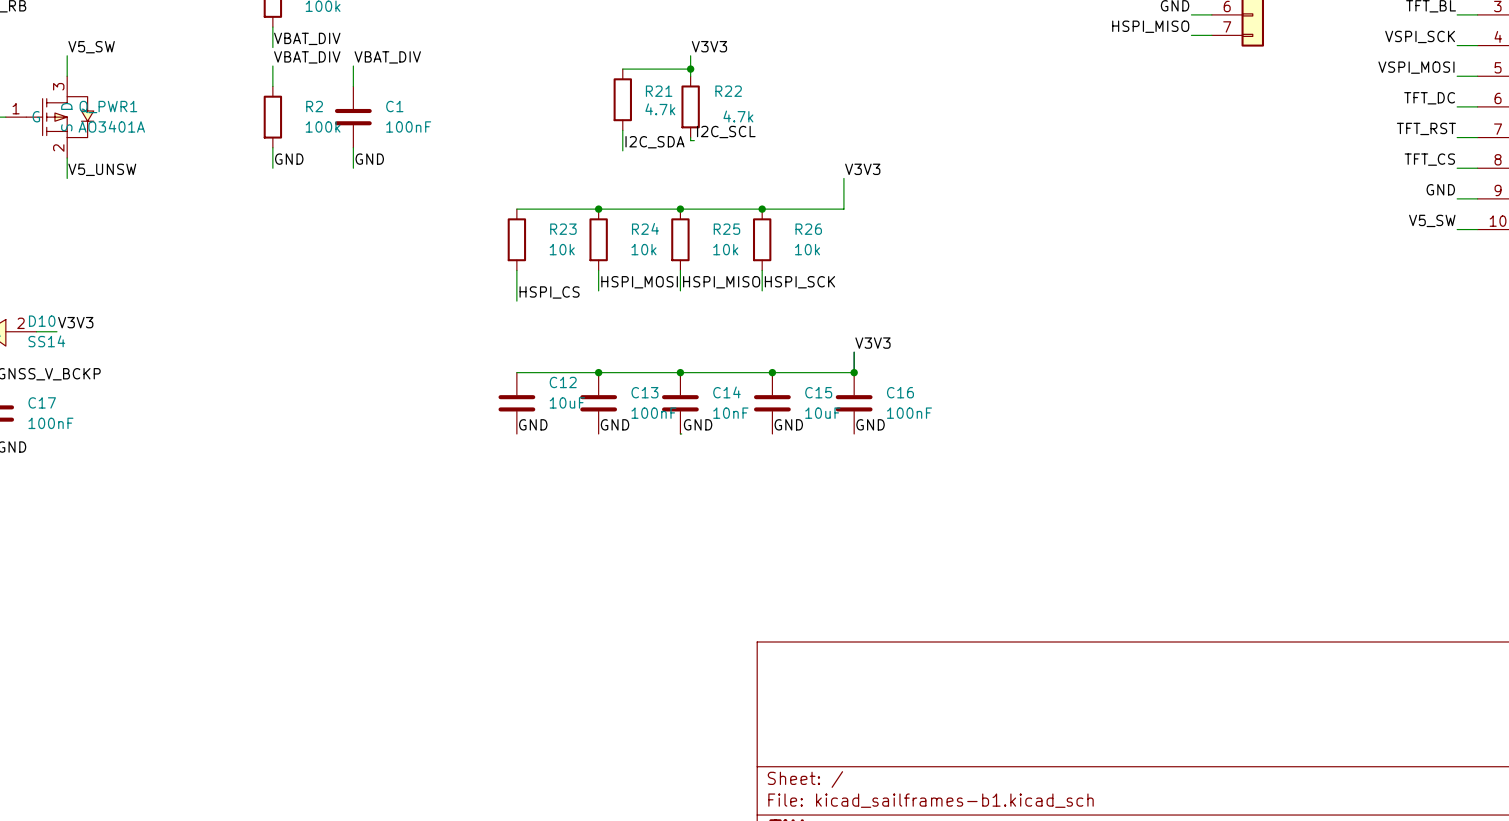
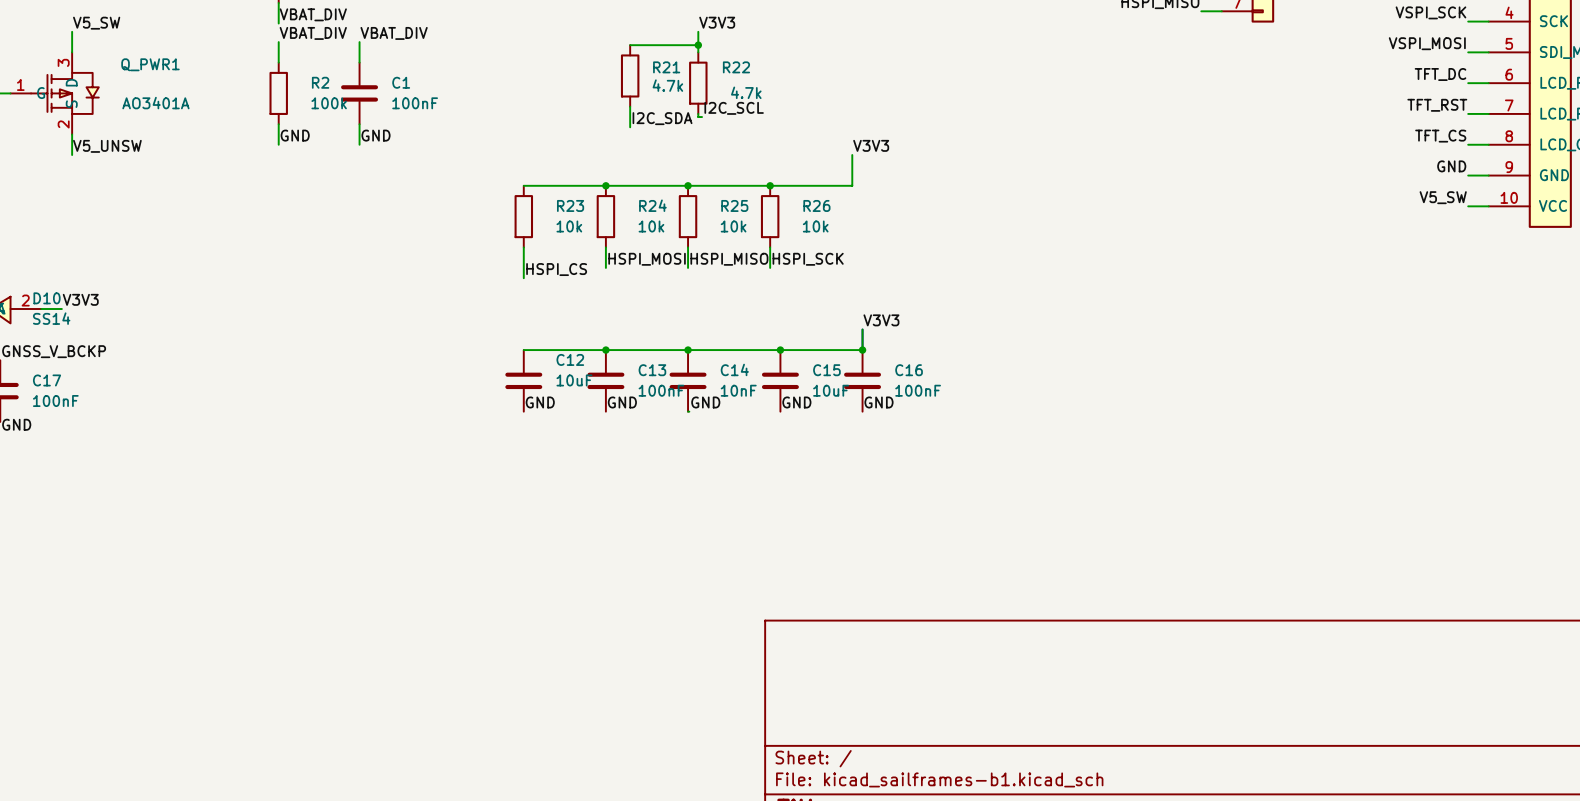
Q_PWR1 name position: Q_PWR1 (108, 107) -> Q_PWR1 (150, 64)
Q_PWR1 value position: AO3401A (111, 126) -> AO3401A (155, 103)

